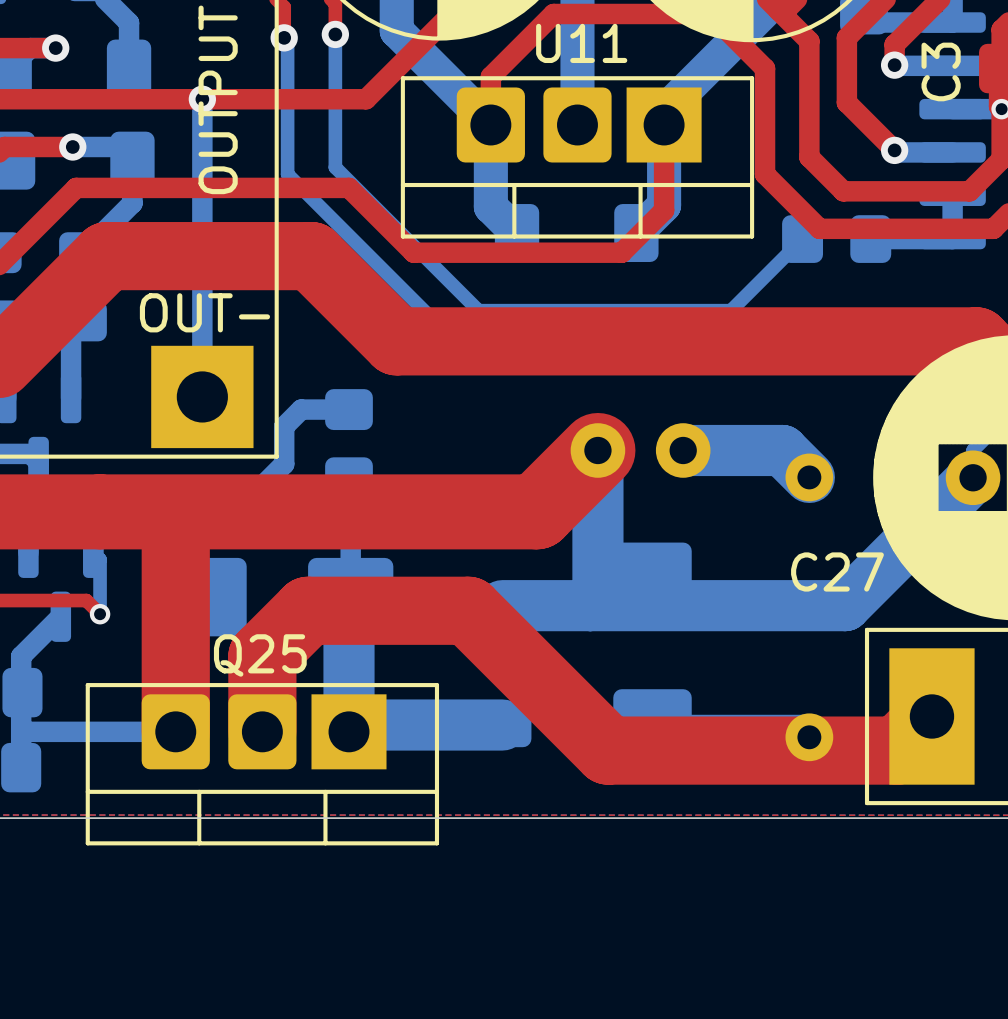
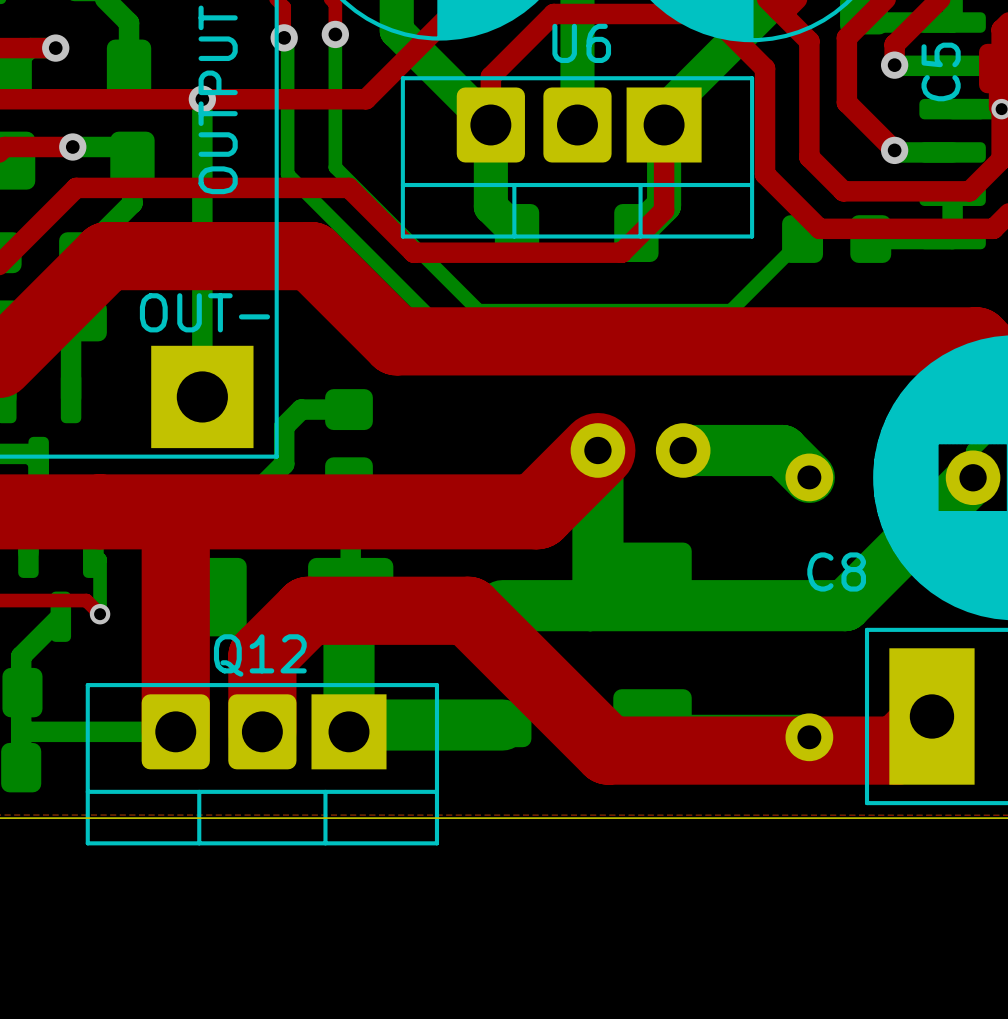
U11 name: U11 (581, 43) -> U6 (581, 43)
C3 name: C3 (941, 71) -> C5 (941, 71)
C27 name: C27 (837, 571) -> C8 (836, 571)
Q25 name: Q25 (260, 655) -> Q12 (260, 655)

